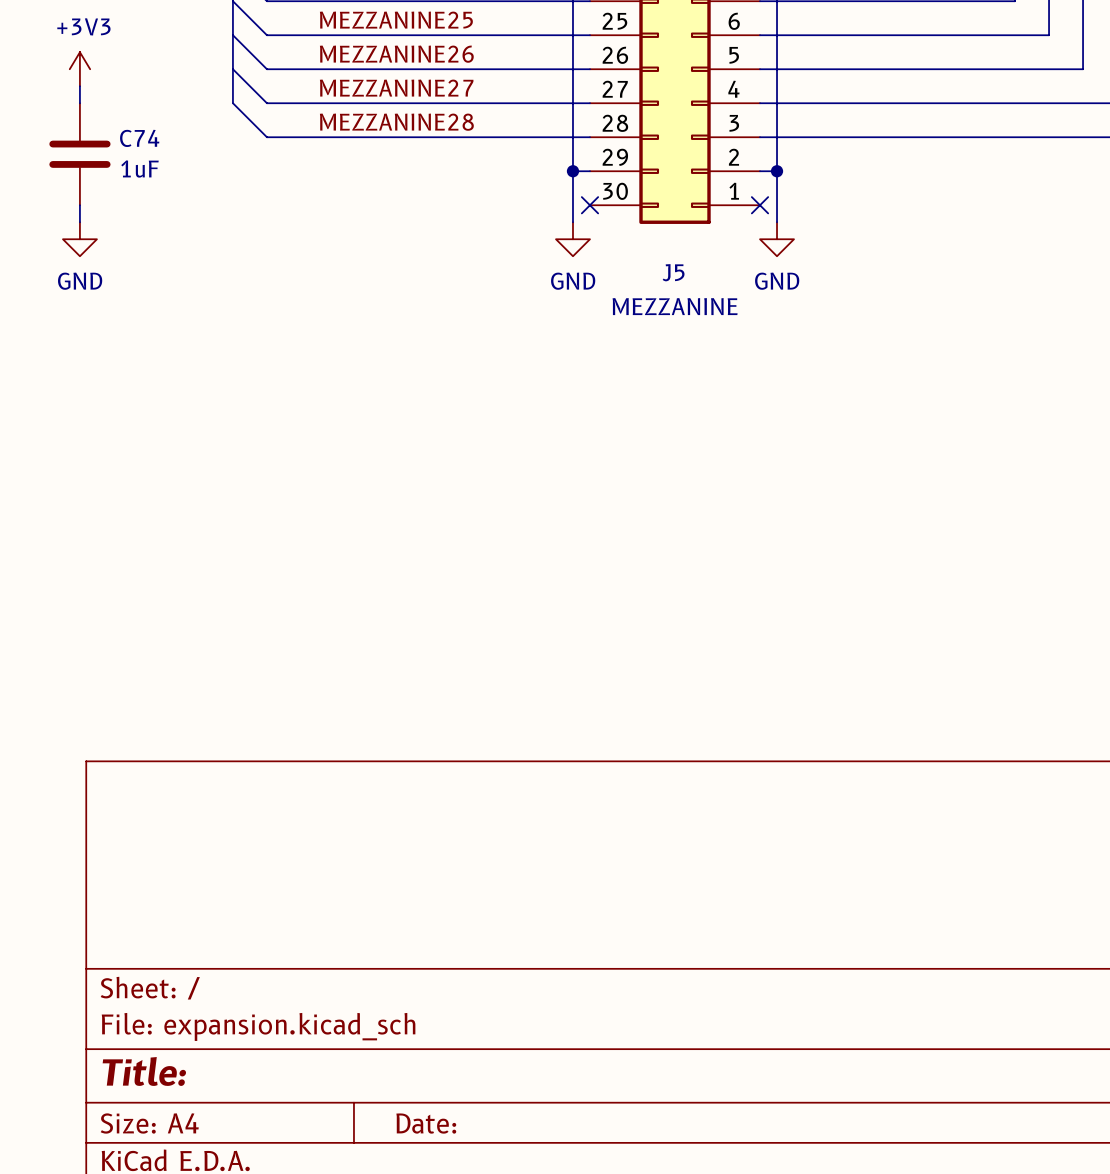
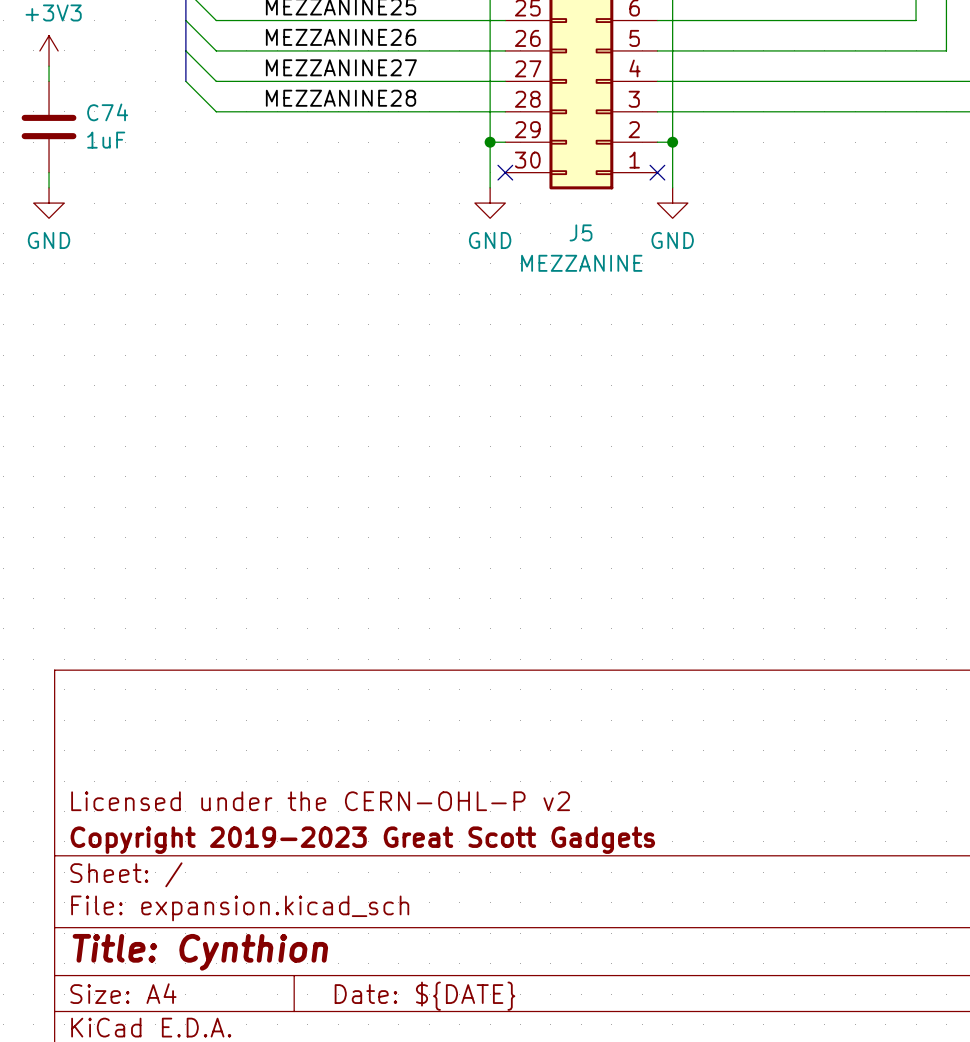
title block: none -> Licensed under the CERN-OHL-P v2 (320, 801)
title block: none -> Copyright 2019-2023 Great Scott Gadgets (362, 840)
title block: Title: (144, 1071) -> Title: Cynthion (200, 952)
title block: Date: (426, 1123) -> Date: ${DATE} (424, 996)

